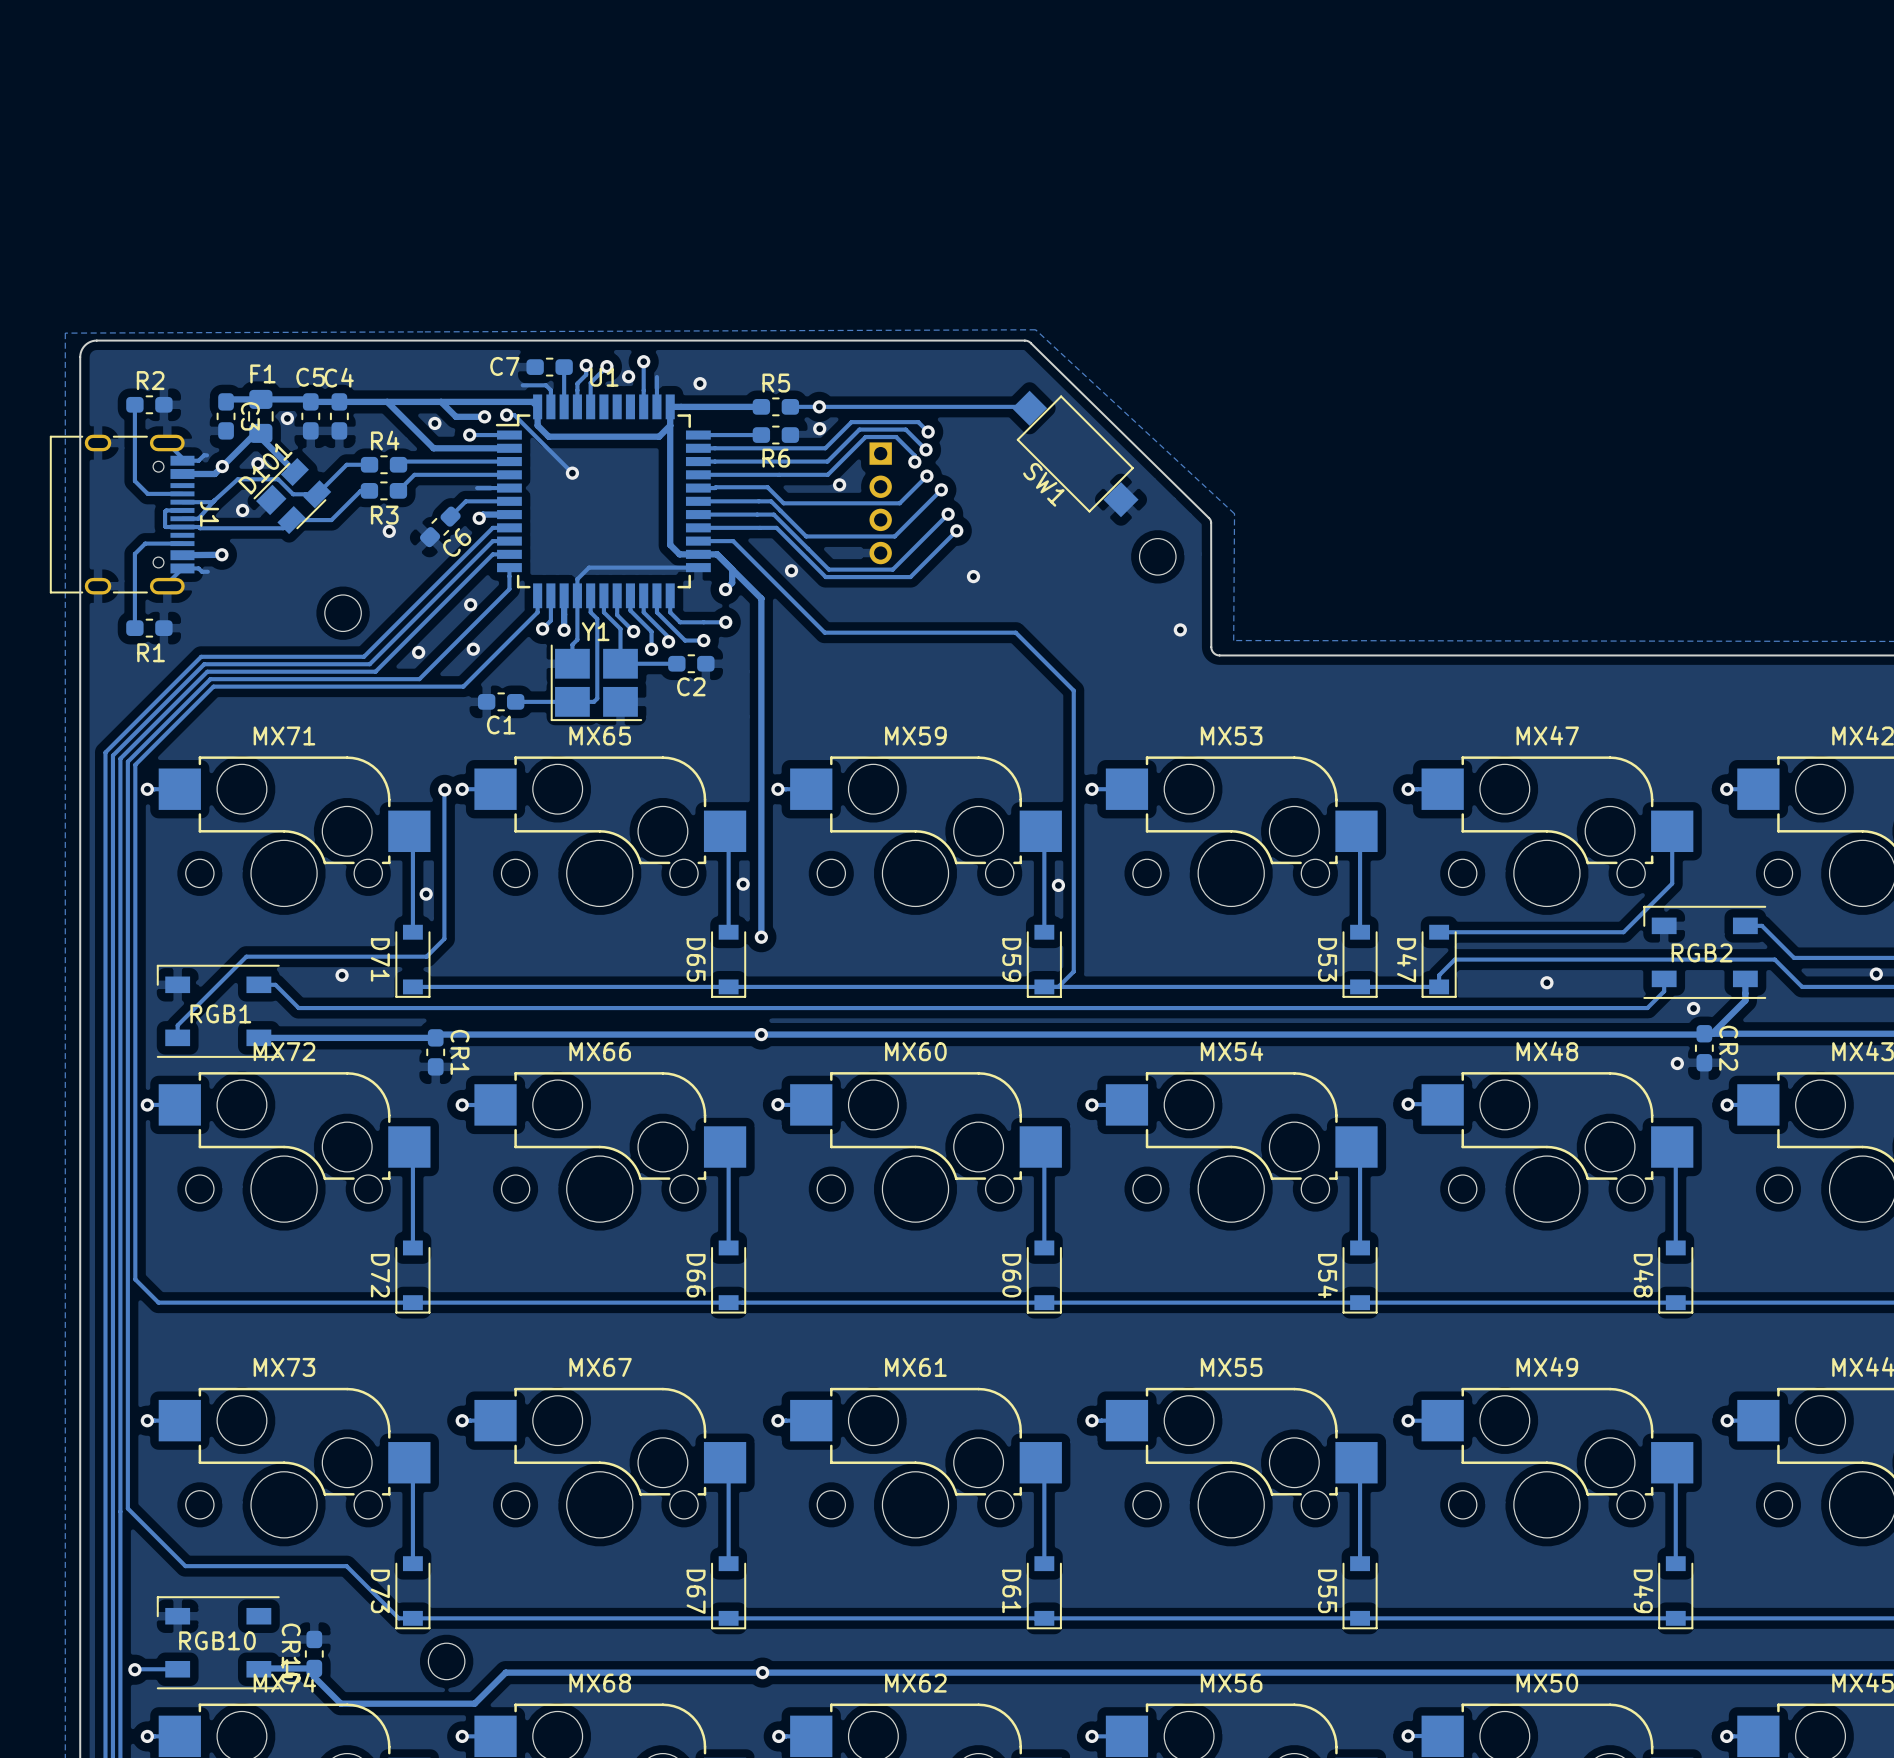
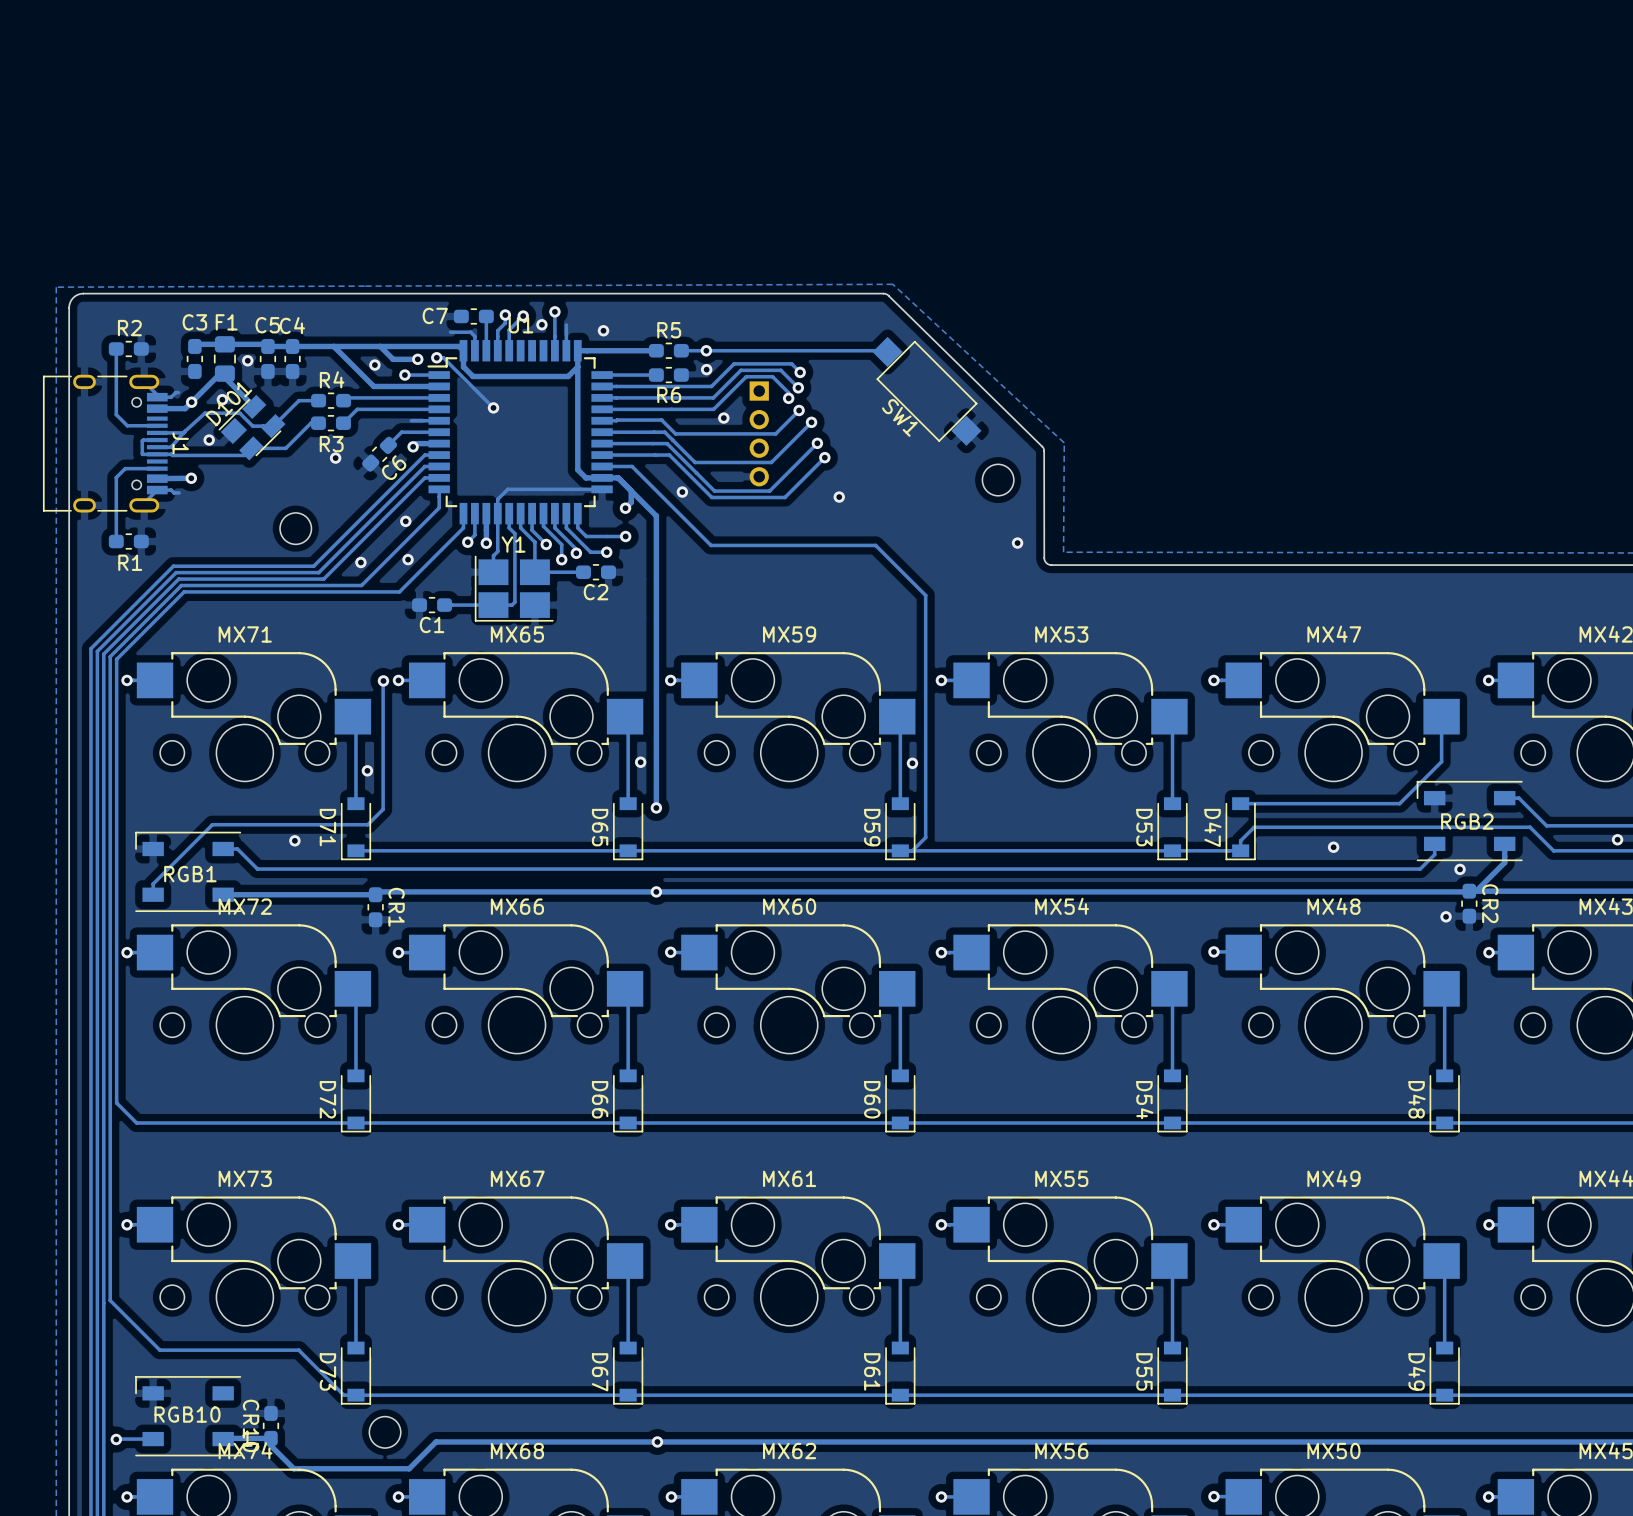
C3 name rotation: 0° (250, 416) -> 90° counterclockwise (194, 322)
C3 name position: C3 (250, 416) -> C3 (194, 322)

